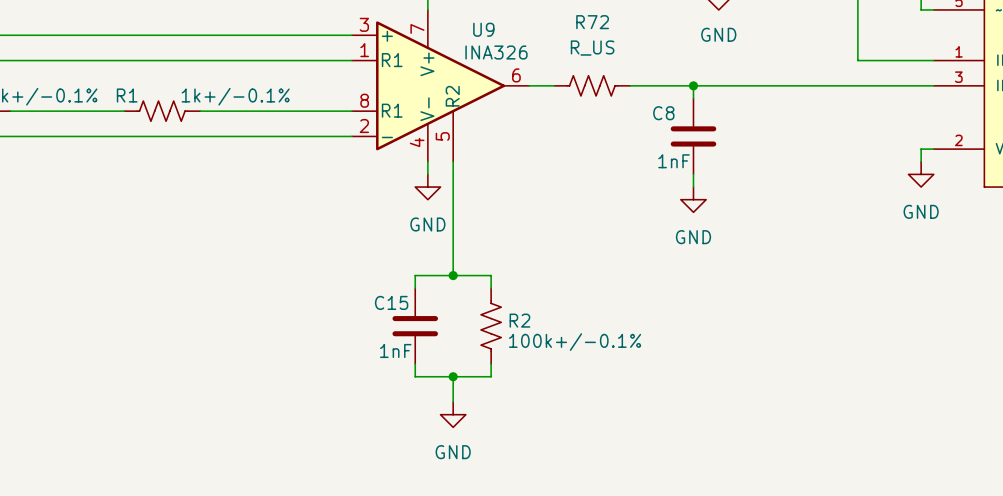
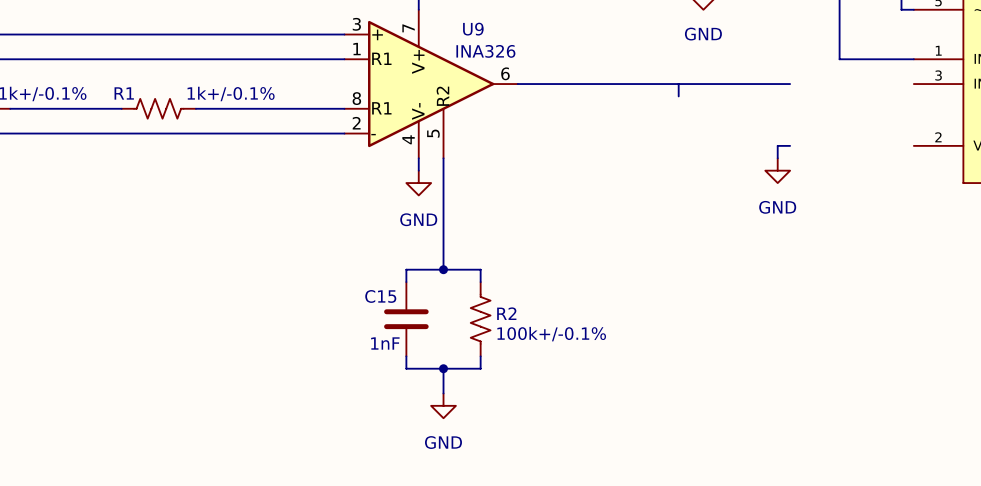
R72: R_US (592, 85) -> none
junction: (693, 85) -> none
wire: (807, 85) (933, 85) -> none
C8: 1nF (693, 136) -> none
wire: (933, 149) (921, 149) (921, 161) -> (790, 145) (777, 145) (777, 158)
wire: (693, 174) (693, 187) -> none
power symbol: none -> GND (777, 170)
power symbol: GND (921, 174) -> none
power symbol: GND (693, 199) -> none

